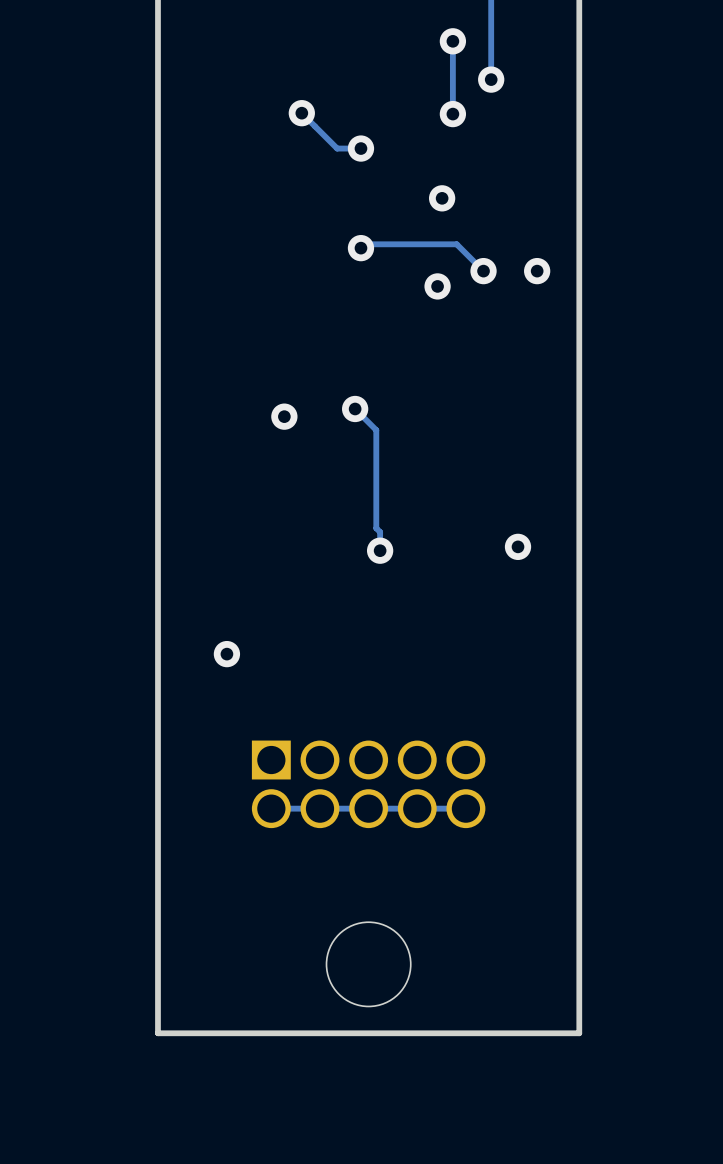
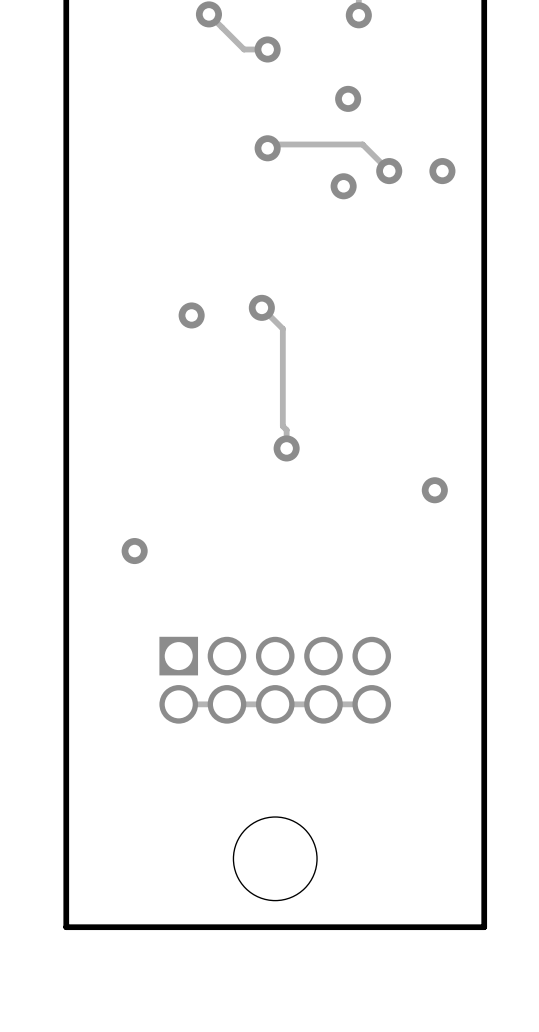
via position: (518, 546) -> (434, 490)

